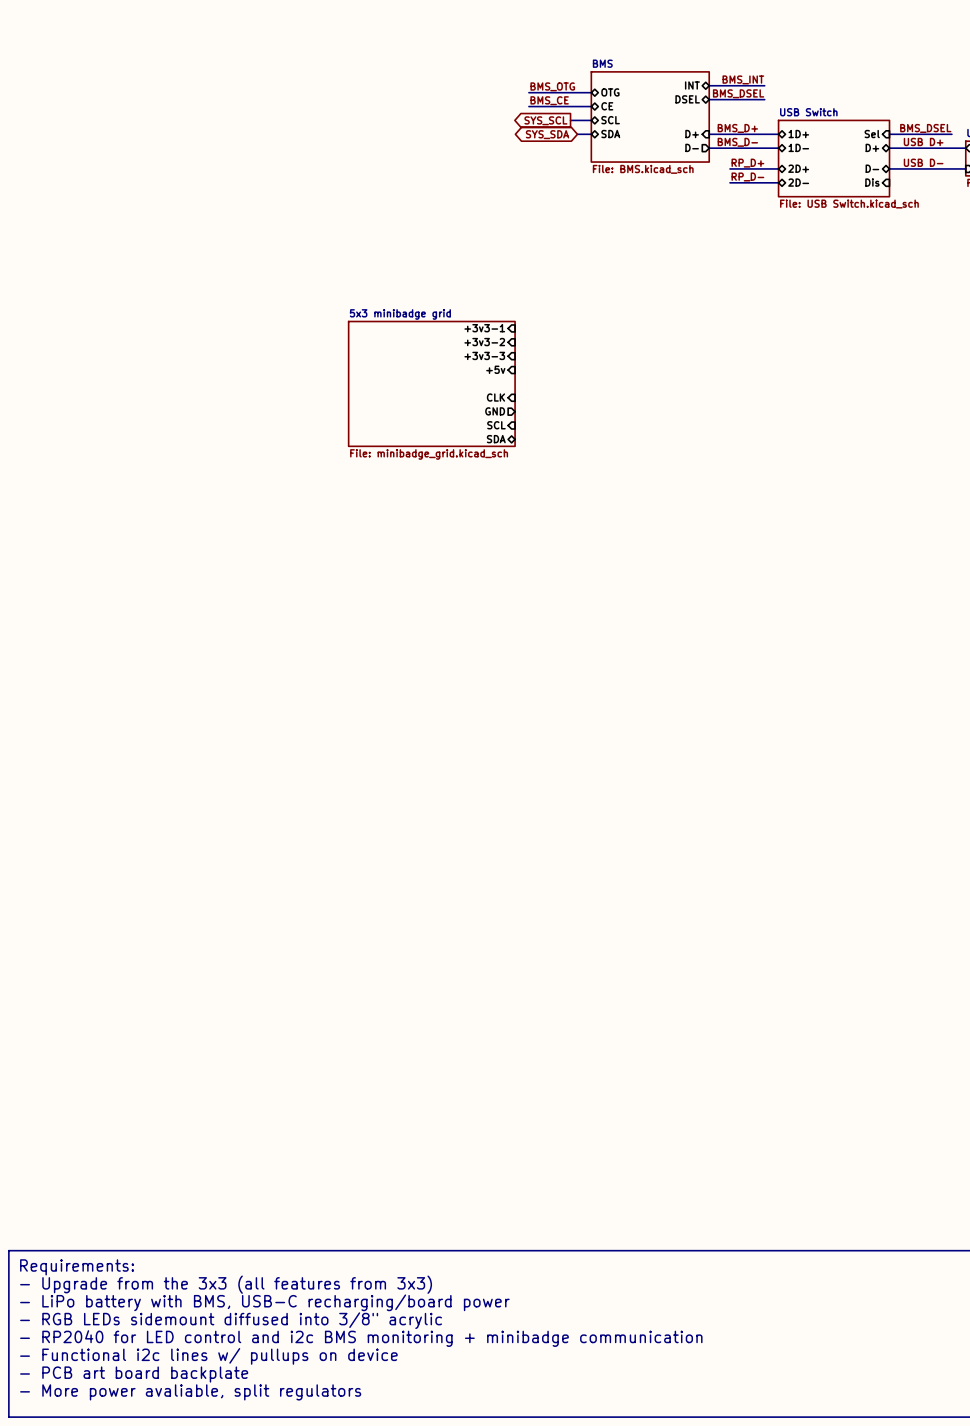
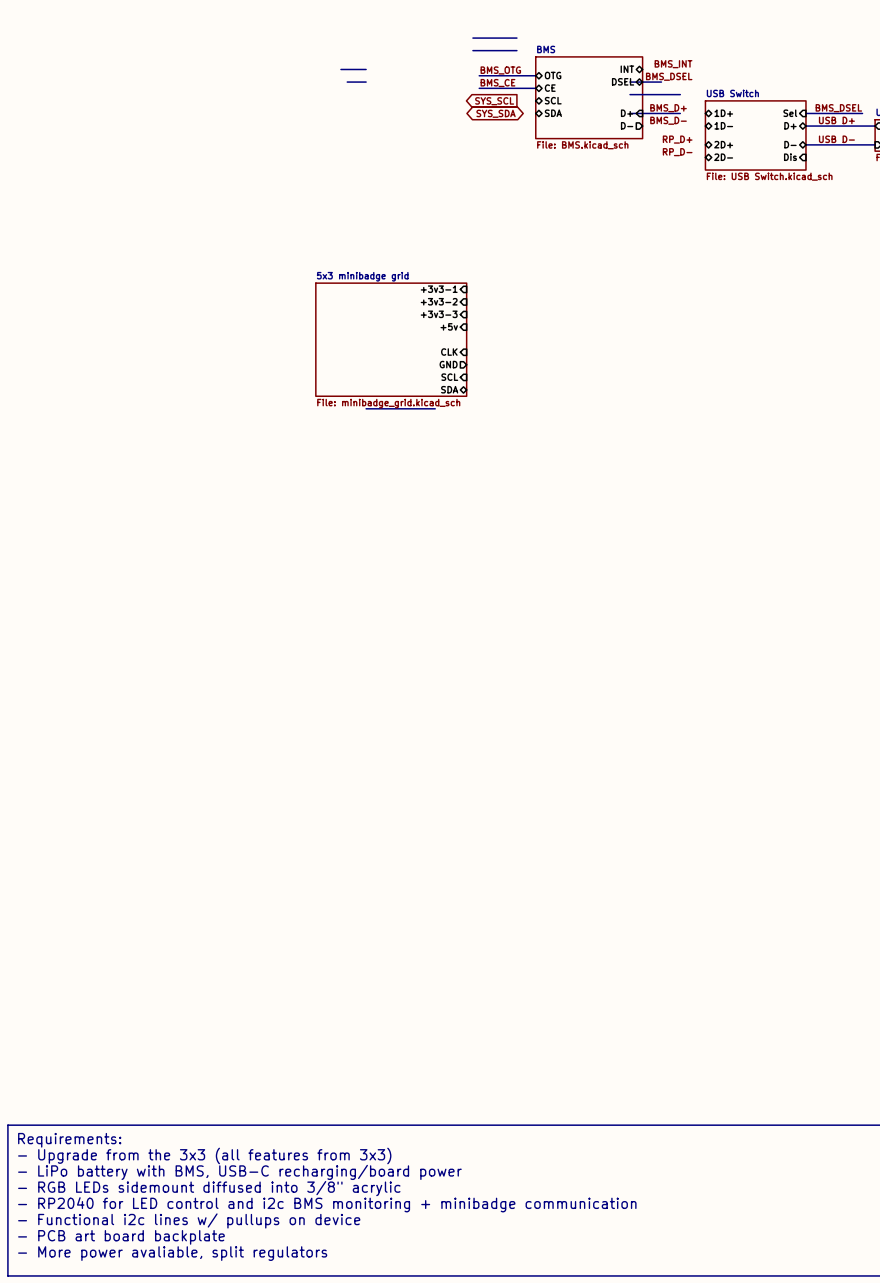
wire: none -> (472, 38) (516, 38)
wire: none -> (472, 50) (516, 50)
wire: none -> (340, 69) (366, 69)
wire: (709, 85) (764, 85) -> (630, 94) (680, 94)
wire: none -> (347, 82) (366, 82)
wire: none -> (630, 82) (642, 82)
wire: (730, 99) (764, 99) -> none
wire: (570, 120) (591, 120) -> none
wire: (577, 134) (591, 134) -> (630, 113) (642, 113)
wire: (750, 134) (778, 134) -> none
wire: (709, 148) (778, 148) -> none
wire: (730, 168) (778, 168) -> none
wire: (730, 182) (778, 182) -> none
wire: none -> (366, 408) (435, 408)

